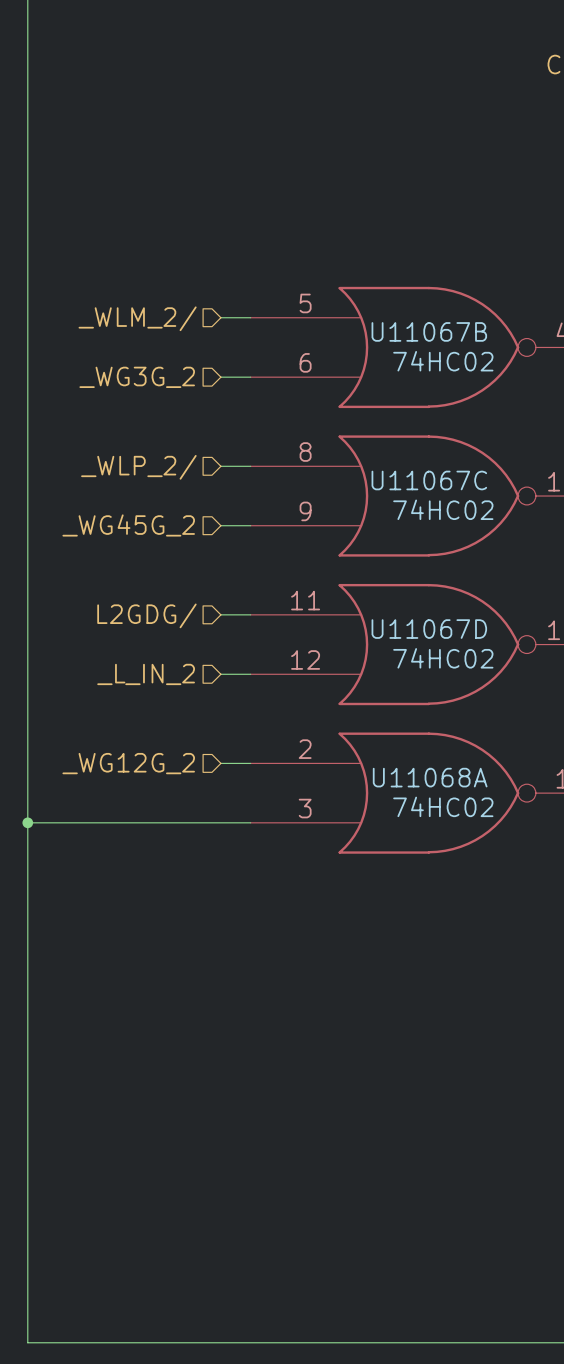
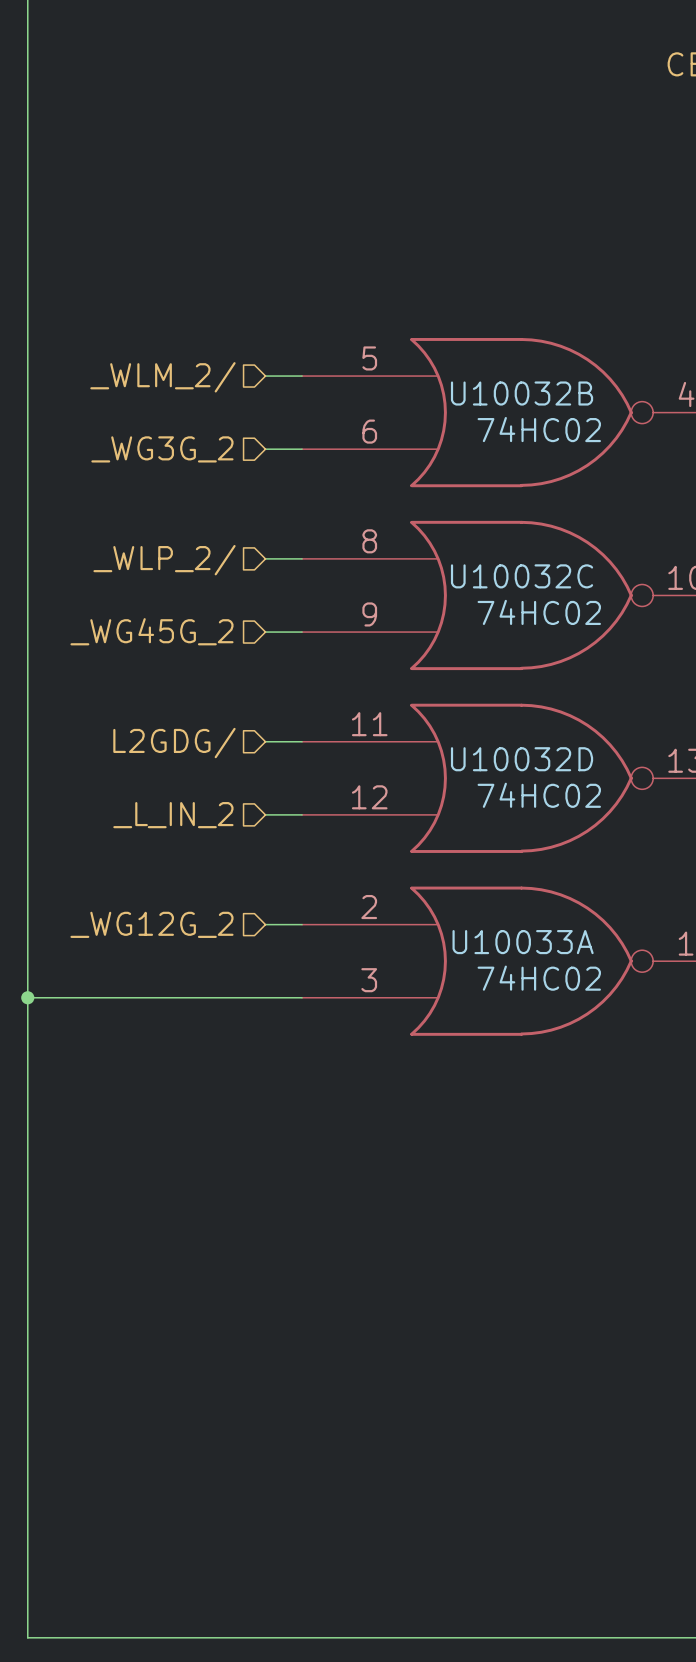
U11067B name: U11067B (429, 331) -> U10032B (522, 393)
U11067C name: U11067C (429, 480) -> U10032C (522, 576)
U11067D name: U11067D (429, 629) -> U10032D (522, 759)
U11068A name: U11068A (430, 777) -> U10033A (523, 942)

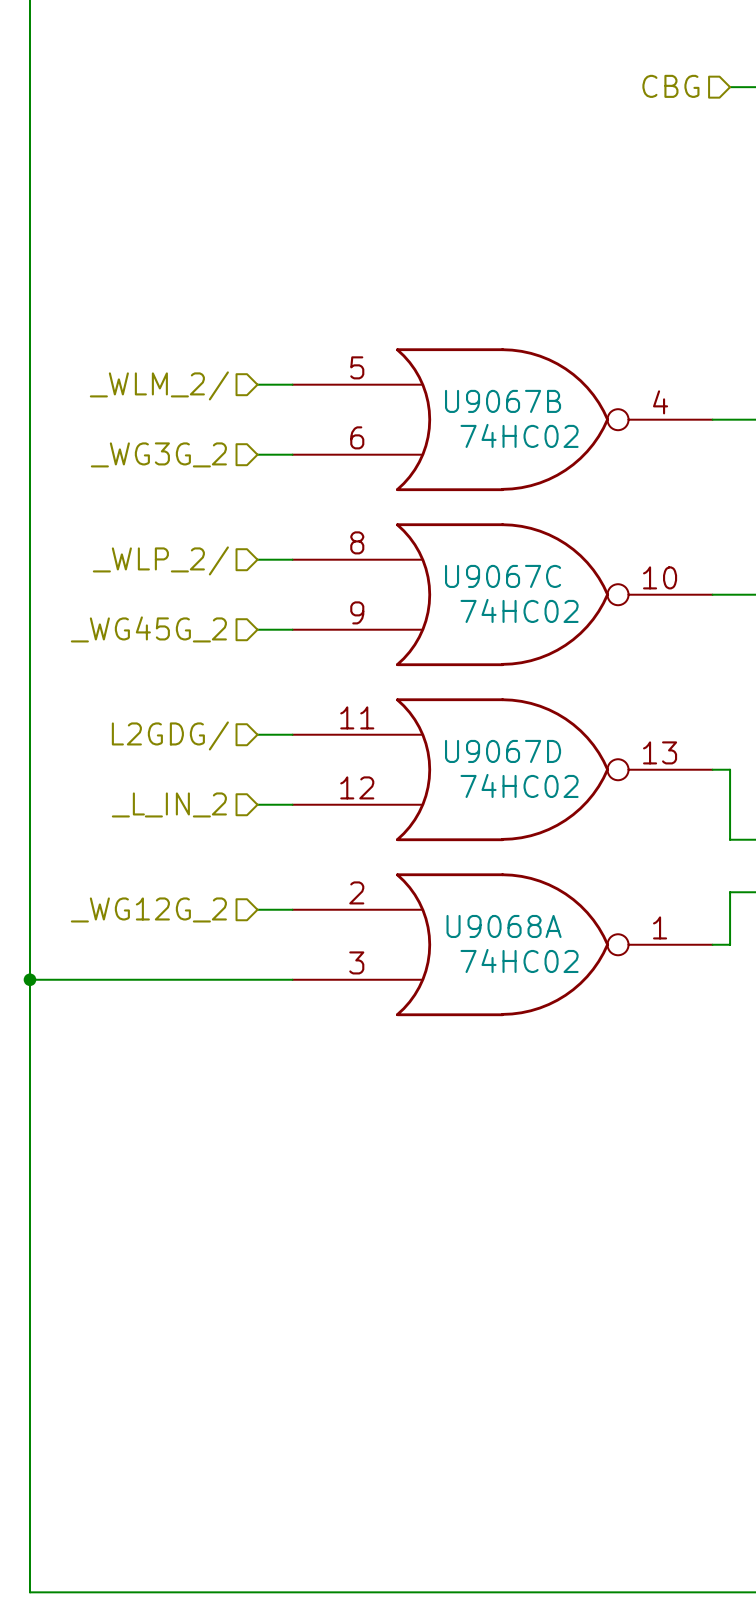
U10032B name: U10032B (522, 393) -> U9067B (503, 401)
U10032C name: U10032C (522, 576) -> U9067C (503, 576)
U10032D name: U10032D (522, 759) -> U9067D (503, 751)
U10033A name: U10033A (523, 942) -> U9068A (504, 926)

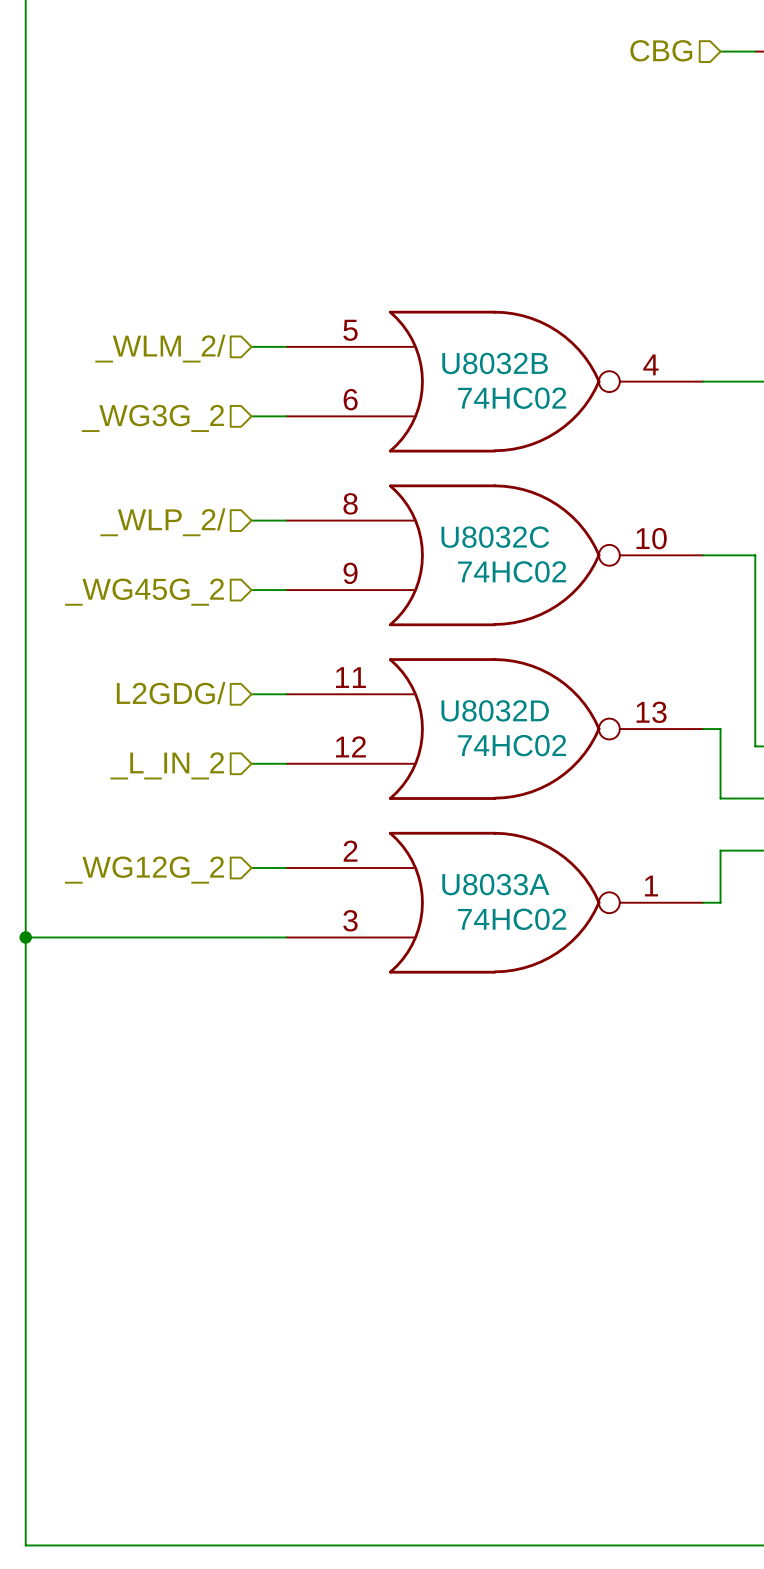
U9067B name: U9067B (503, 401) -> U8032B (495, 363)
U9067C name: U9067C (503, 576) -> U8032C (495, 537)
U9067D name: U9067D (503, 751) -> U8032D (495, 710)
U9068A name: U9068A (504, 926) -> U8033A (495, 884)

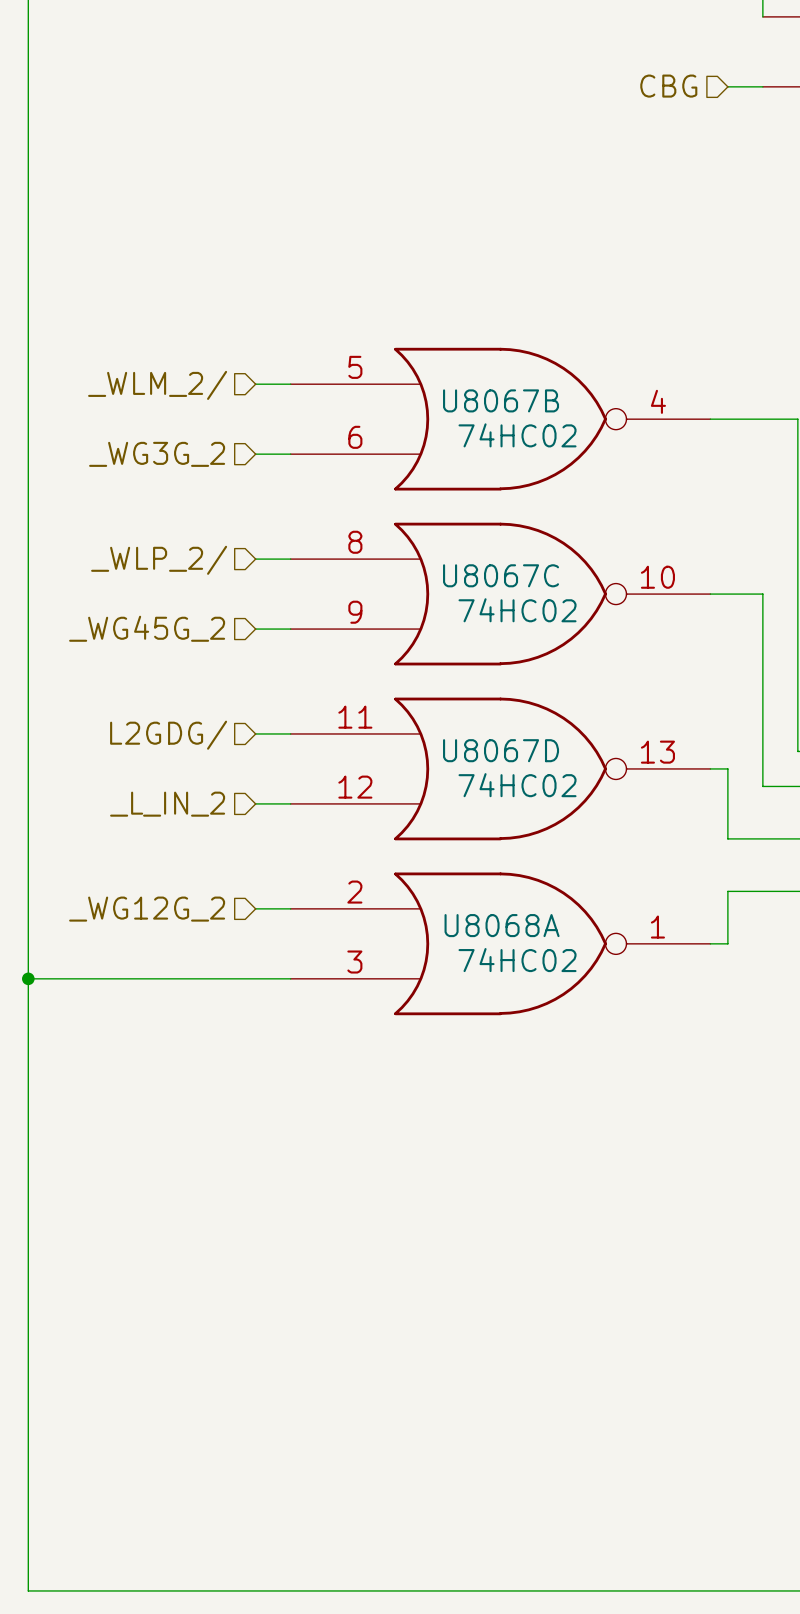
U8032B name: U8032B (495, 363) -> U8067B (501, 400)
U8032C name: U8032C (495, 537) -> U8067C (501, 575)
U8032D name: U8032D (495, 710) -> U8067D (501, 750)
U8033A name: U8033A (495, 884) -> U8068A (502, 925)

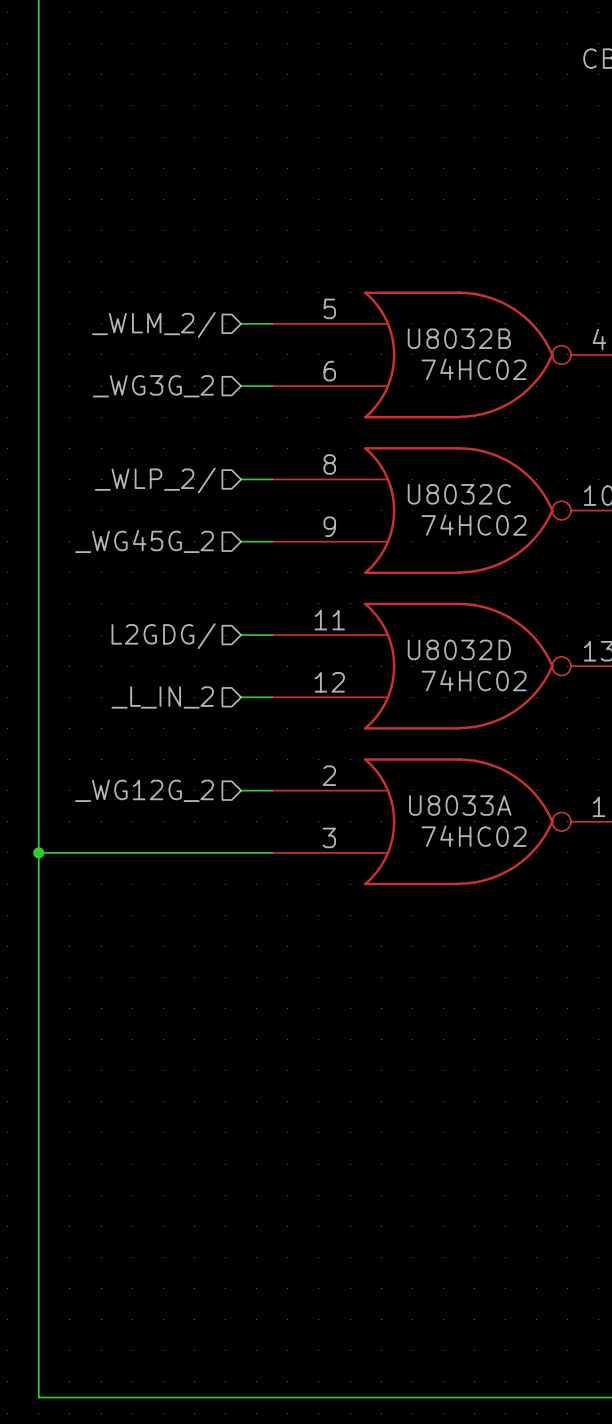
U8067B name: U8067B (501, 400) -> U8032B (459, 338)
U8067C name: U8067C (501, 575) -> U8032C (459, 494)
U8067D name: U8067D (501, 750) -> U8032D (459, 649)
U8068A name: U8068A (502, 925) -> U8033A (460, 805)

